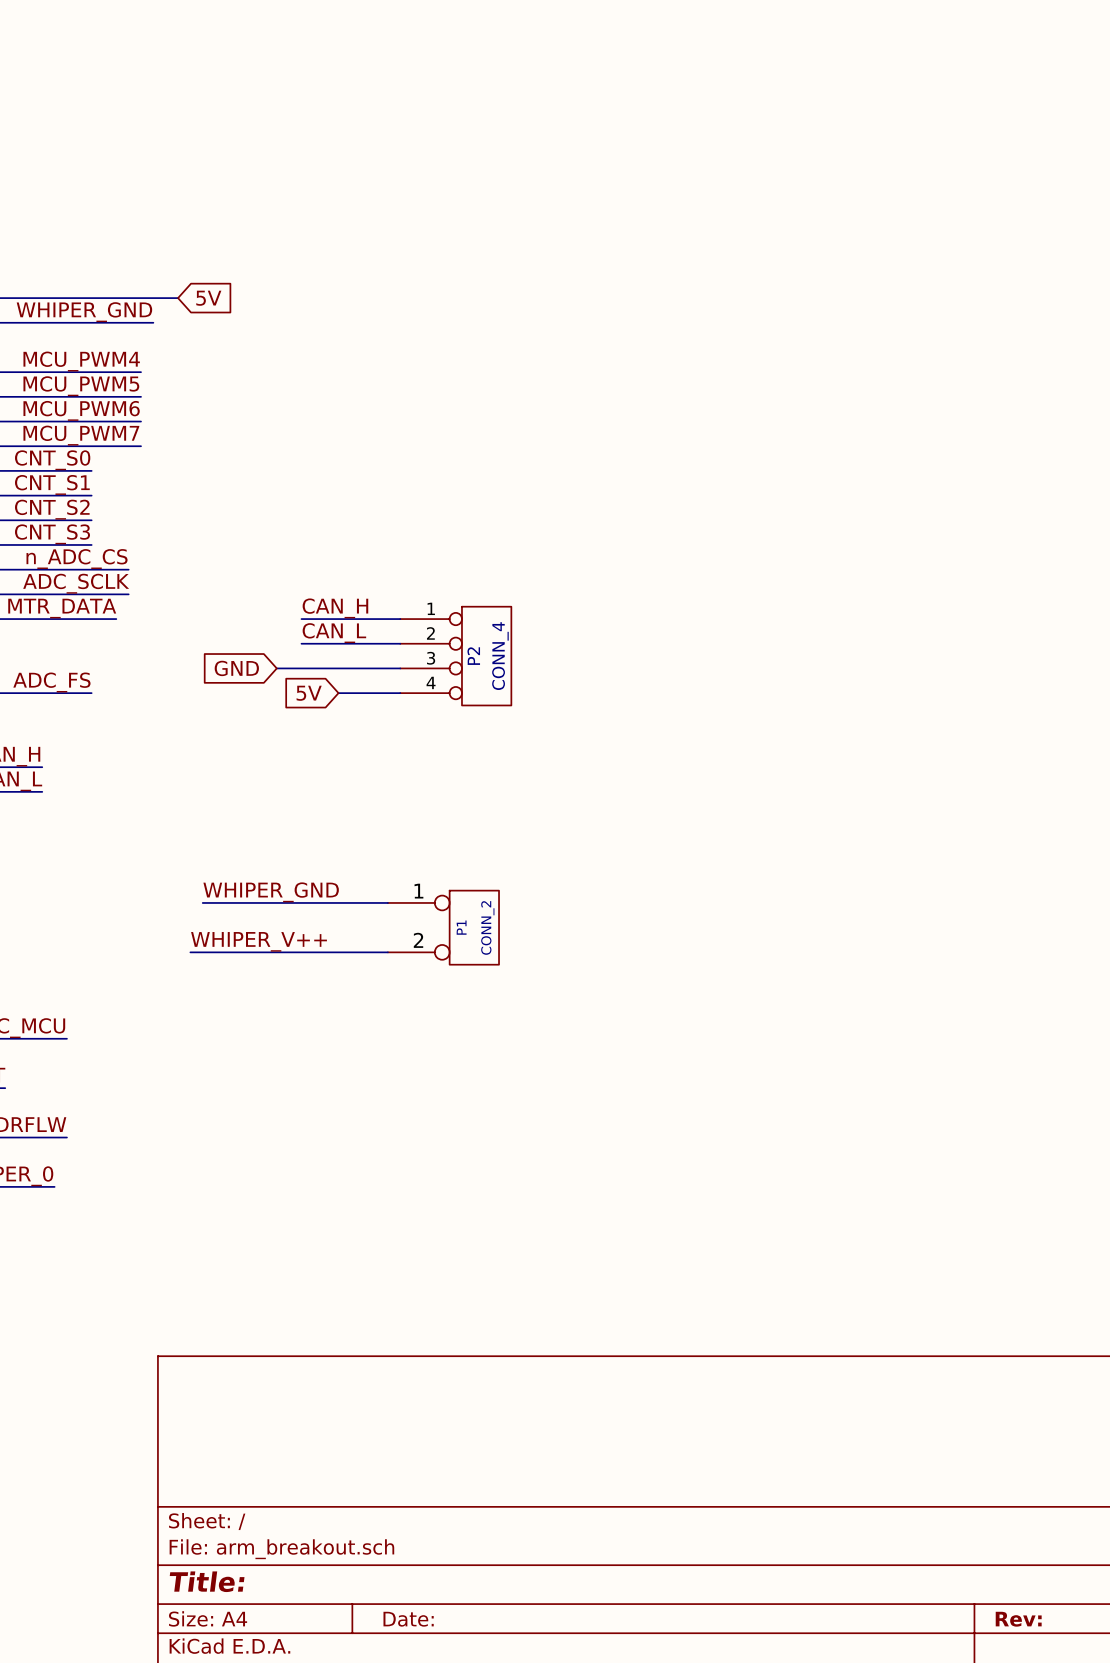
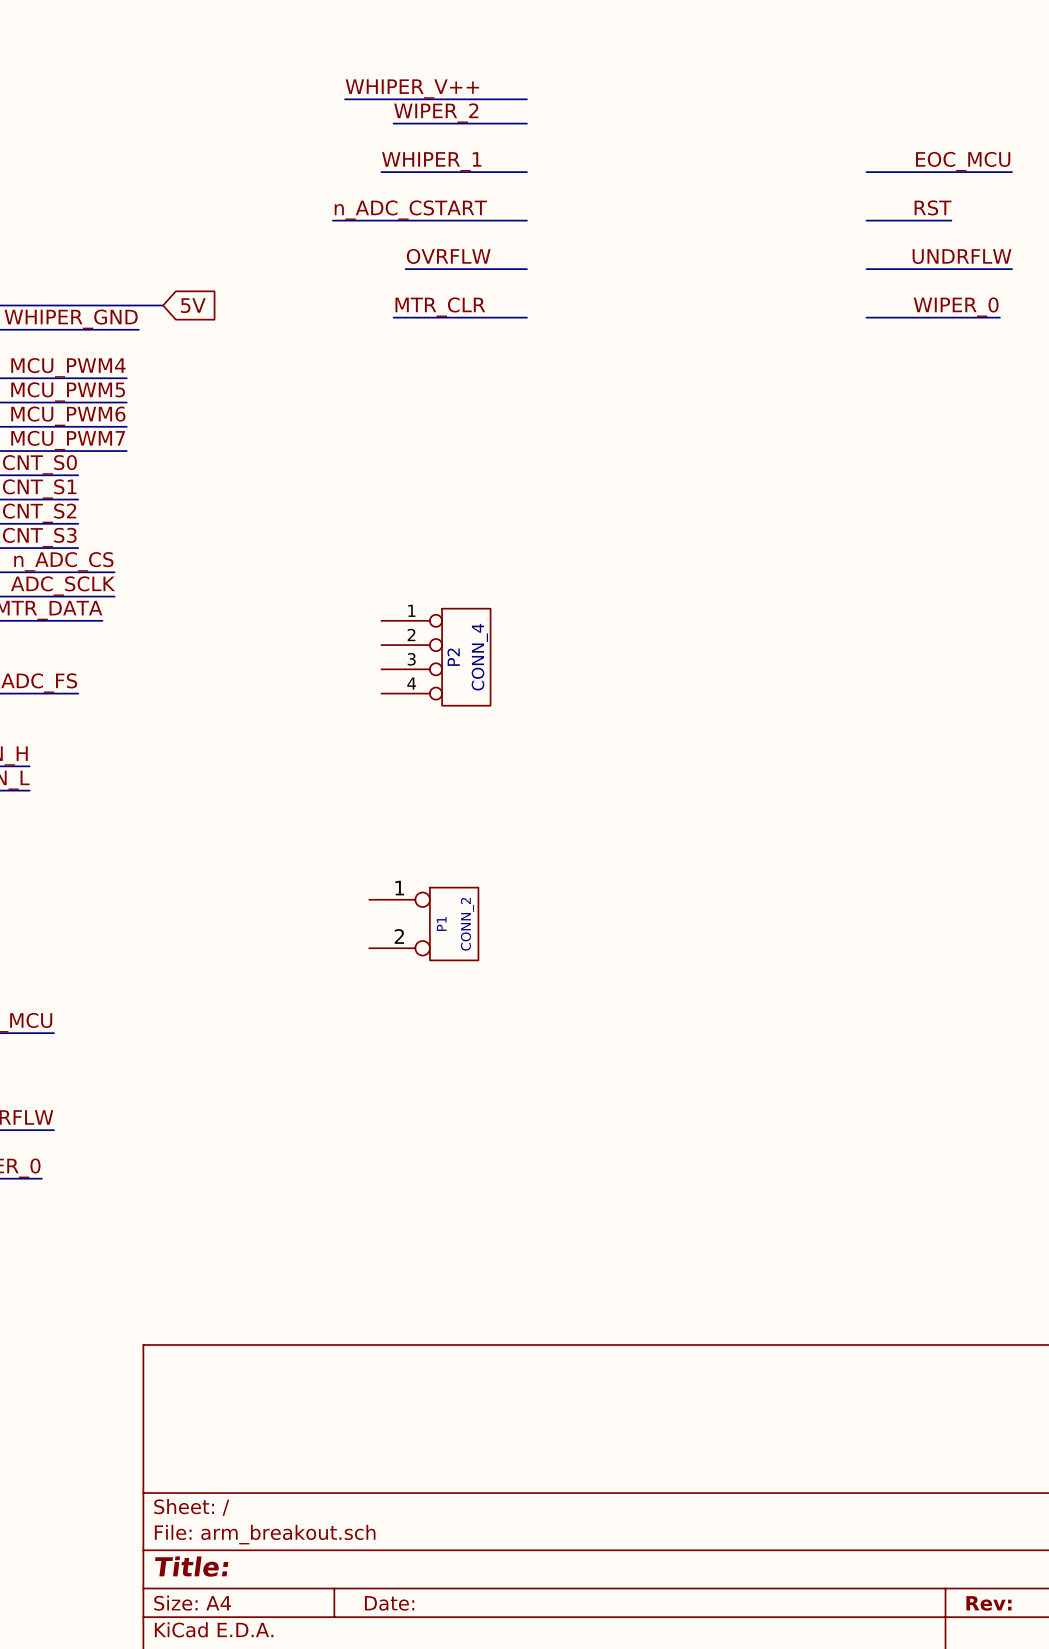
label: none -> WHIPER_V++ (412, 88)
wire: none -> (345, 99) (526, 99)
label: none -> WIPER_2 (436, 113)
wire: none -> (393, 123) (526, 123)
label: none -> WHIPER_1 (431, 161)
label: none -> EOC_MCU (963, 161)
wire: none -> (381, 172) (526, 172)
wire: none -> (866, 172) (1012, 172)
label: none -> RST (933, 207)
label: none -> n_ADC_CSTART (410, 210)
wire: none -> (332, 220) (526, 220)
wire: none -> (866, 220) (951, 220)
label: none -> OVRFLW (448, 256)
label: none -> UNDRFLW (962, 256)
wire: none -> (405, 269) (526, 269)
wire: none -> (866, 269) (1012, 269)
label: none -> MTR_CLR (440, 307)
label: none -> WIPER_0 (956, 307)
wire: none -> (393, 317) (526, 317)
wire: none -> (866, 317) (999, 317)
label: CAN_H (335, 608) -> none
wire: (301, 619) (400, 619) -> none
label: CAN_L (334, 633) -> none
wire: (301, 643) (400, 643) -> none
global label: GND (236, 668) -> none
wire: (276, 668) (400, 668) -> none
global label: 5V (309, 693) -> none
wire: (338, 693) (400, 693) -> none
label: WHIPER_GND (271, 892) -> none
wire: (202, 902) (387, 902) -> none
label: WHIPER_V++ (259, 941) -> none
wire: (190, 952) (387, 952) -> none

